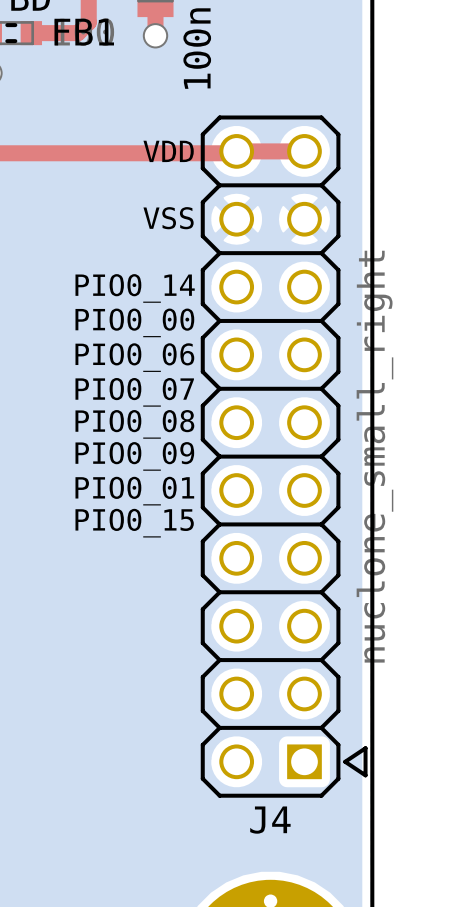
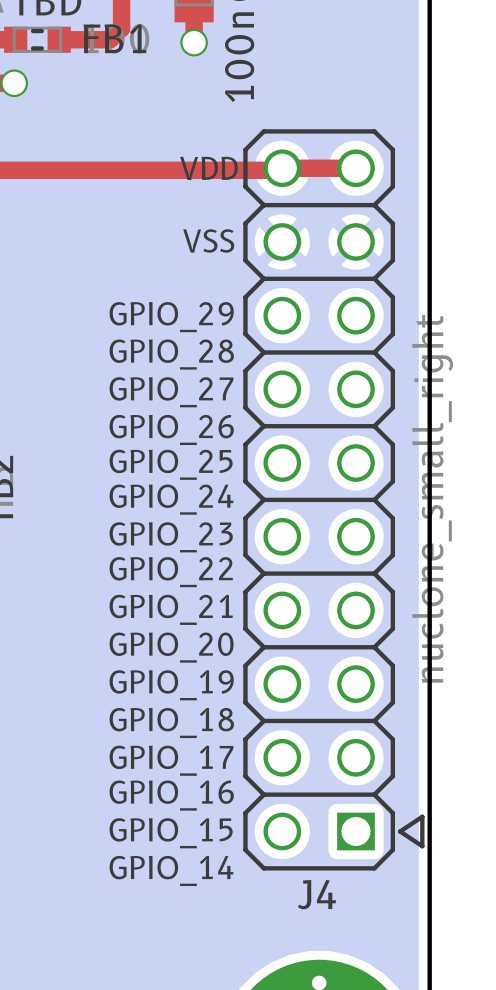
J4 footprint: [200, 115, 368, 798] -> [243, 129, 425, 871]

